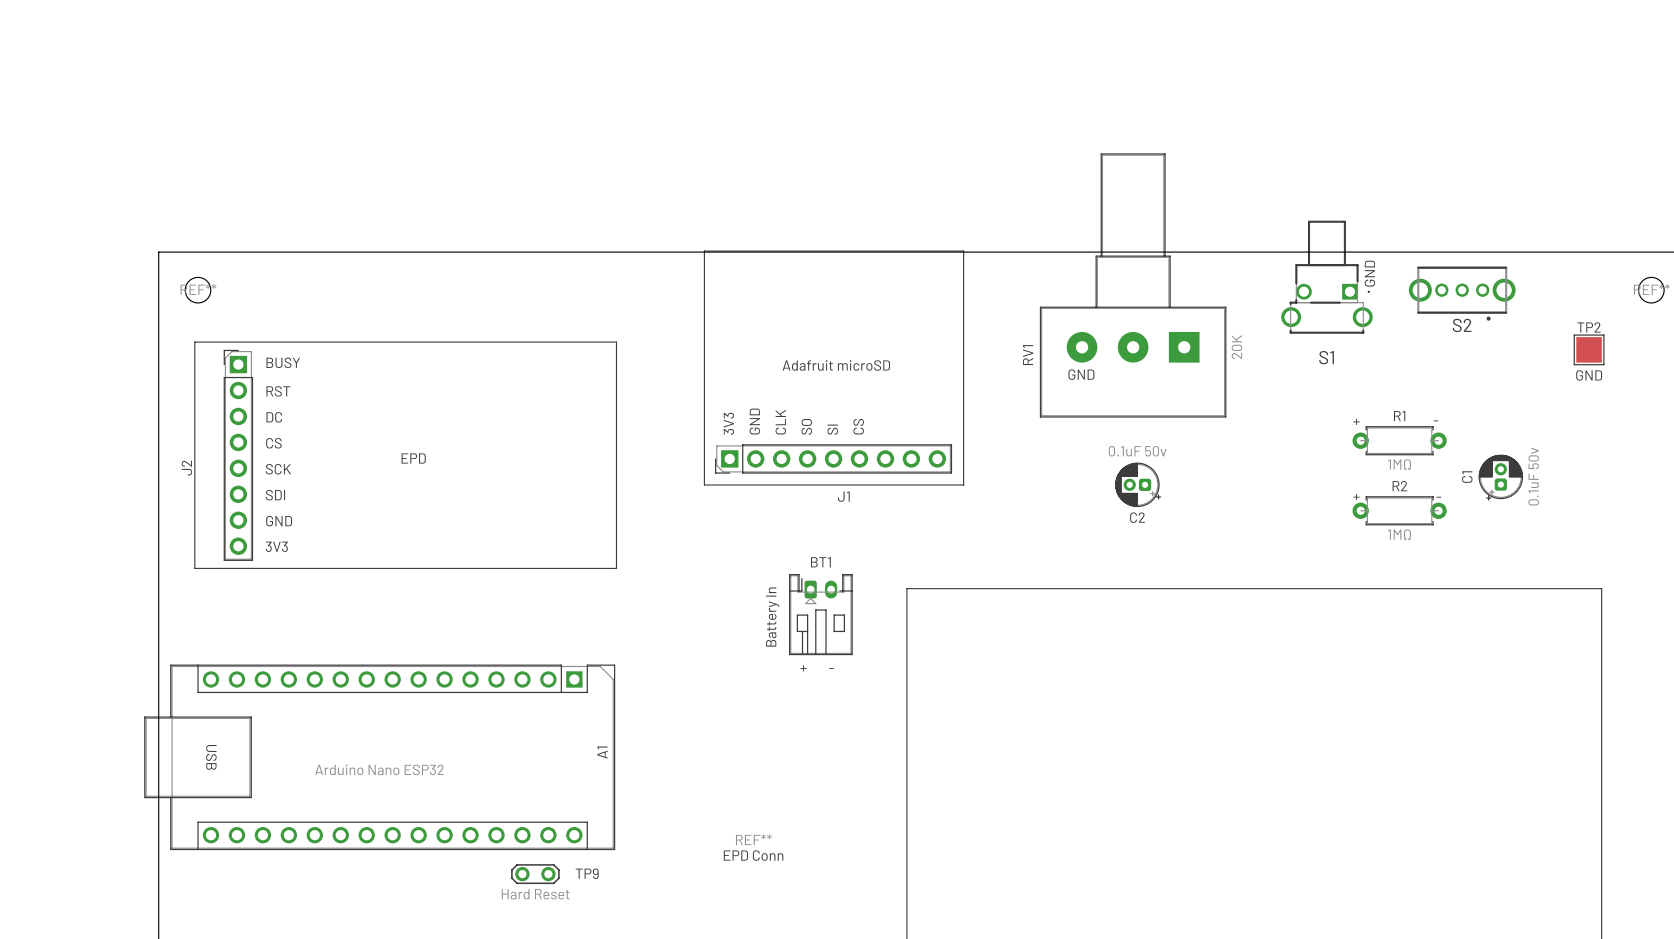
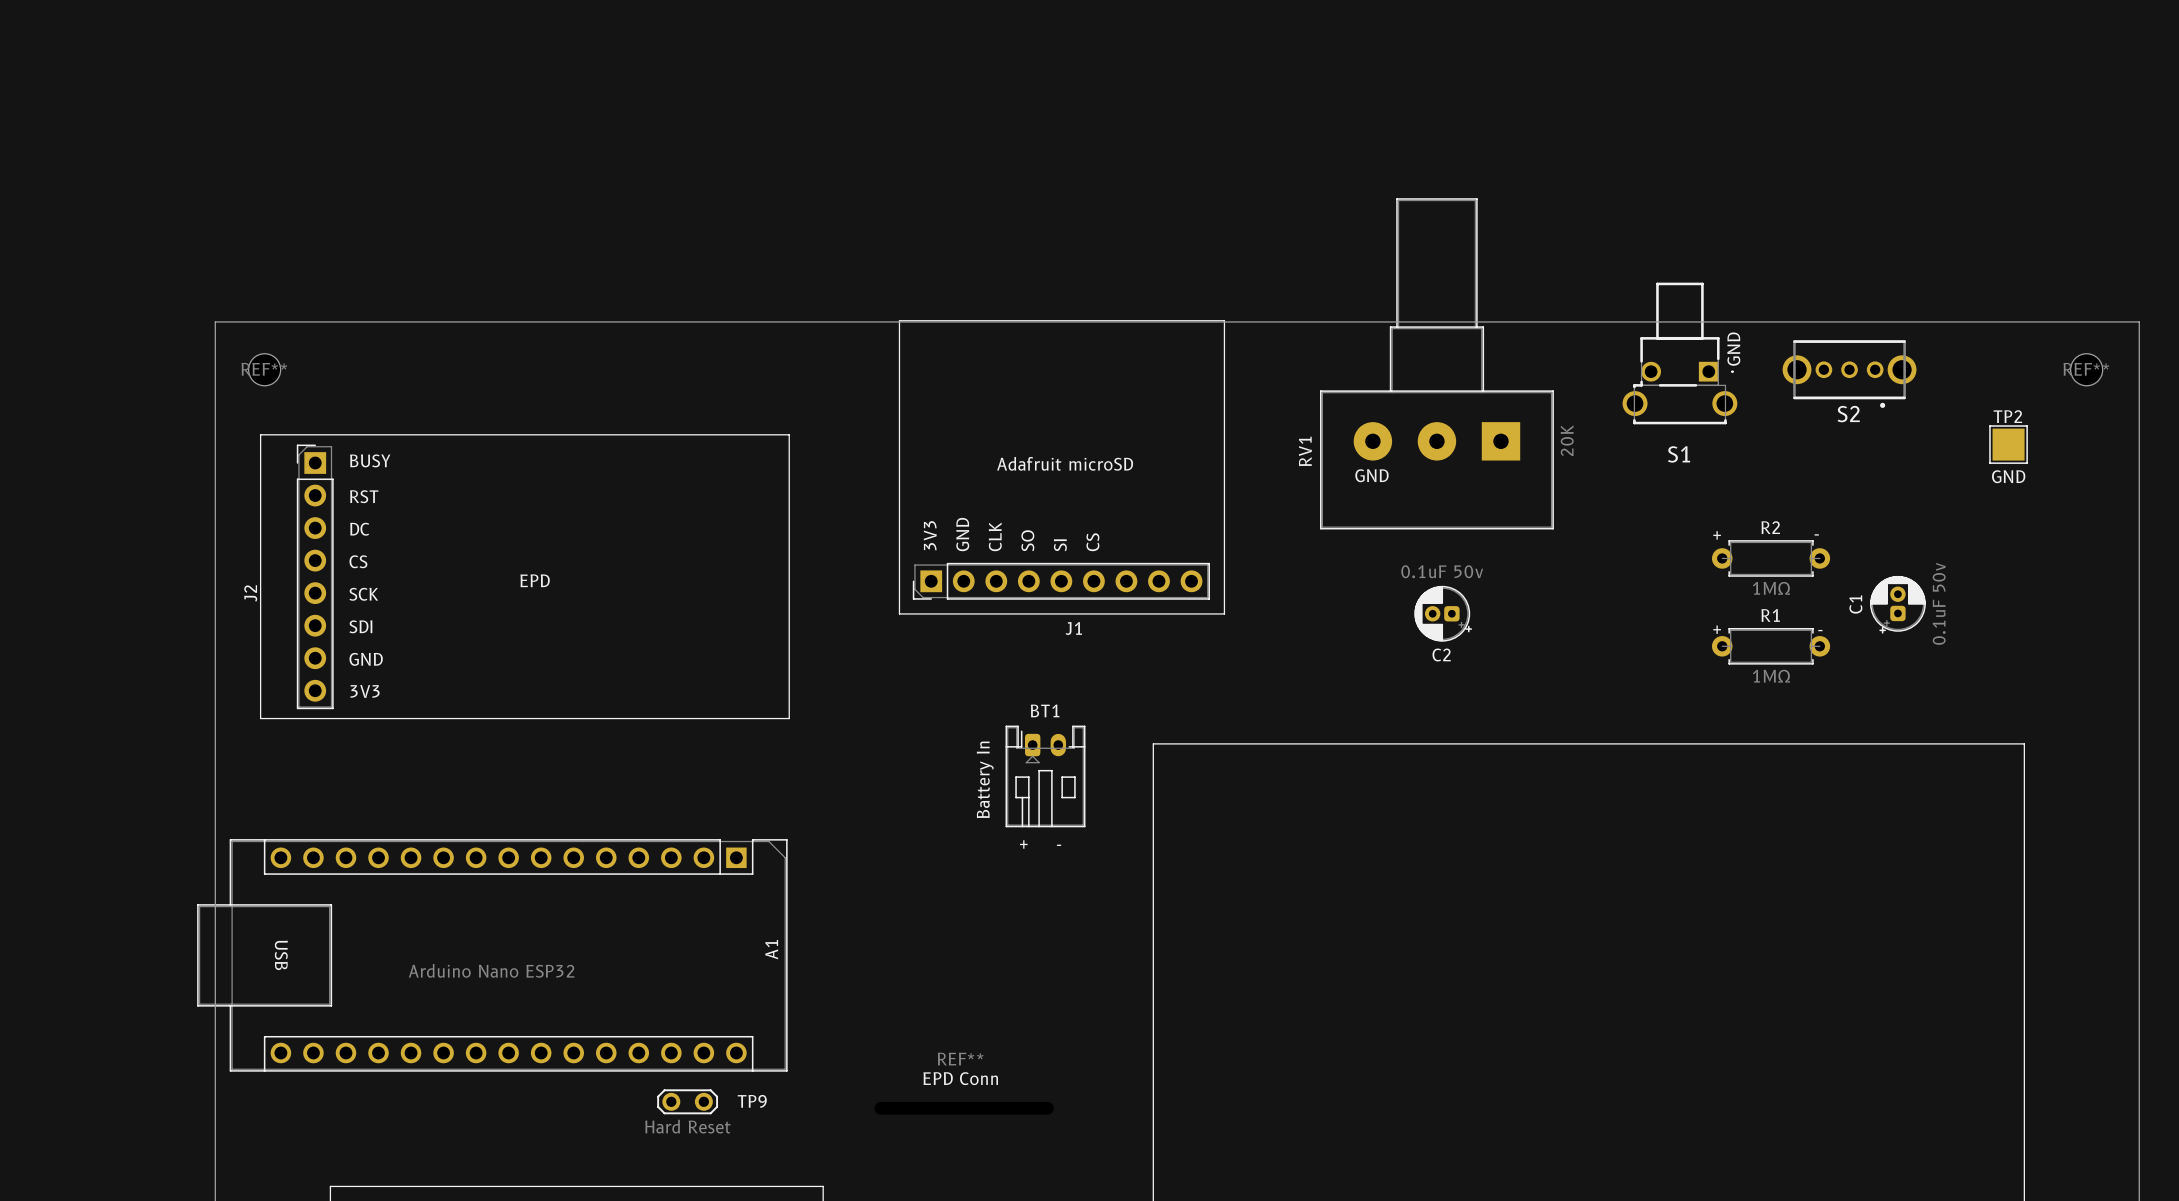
R1 name: R1 (1399, 416) -> R2 (1770, 527)
R2 name: R2 (1399, 486) -> R1 (1770, 615)

